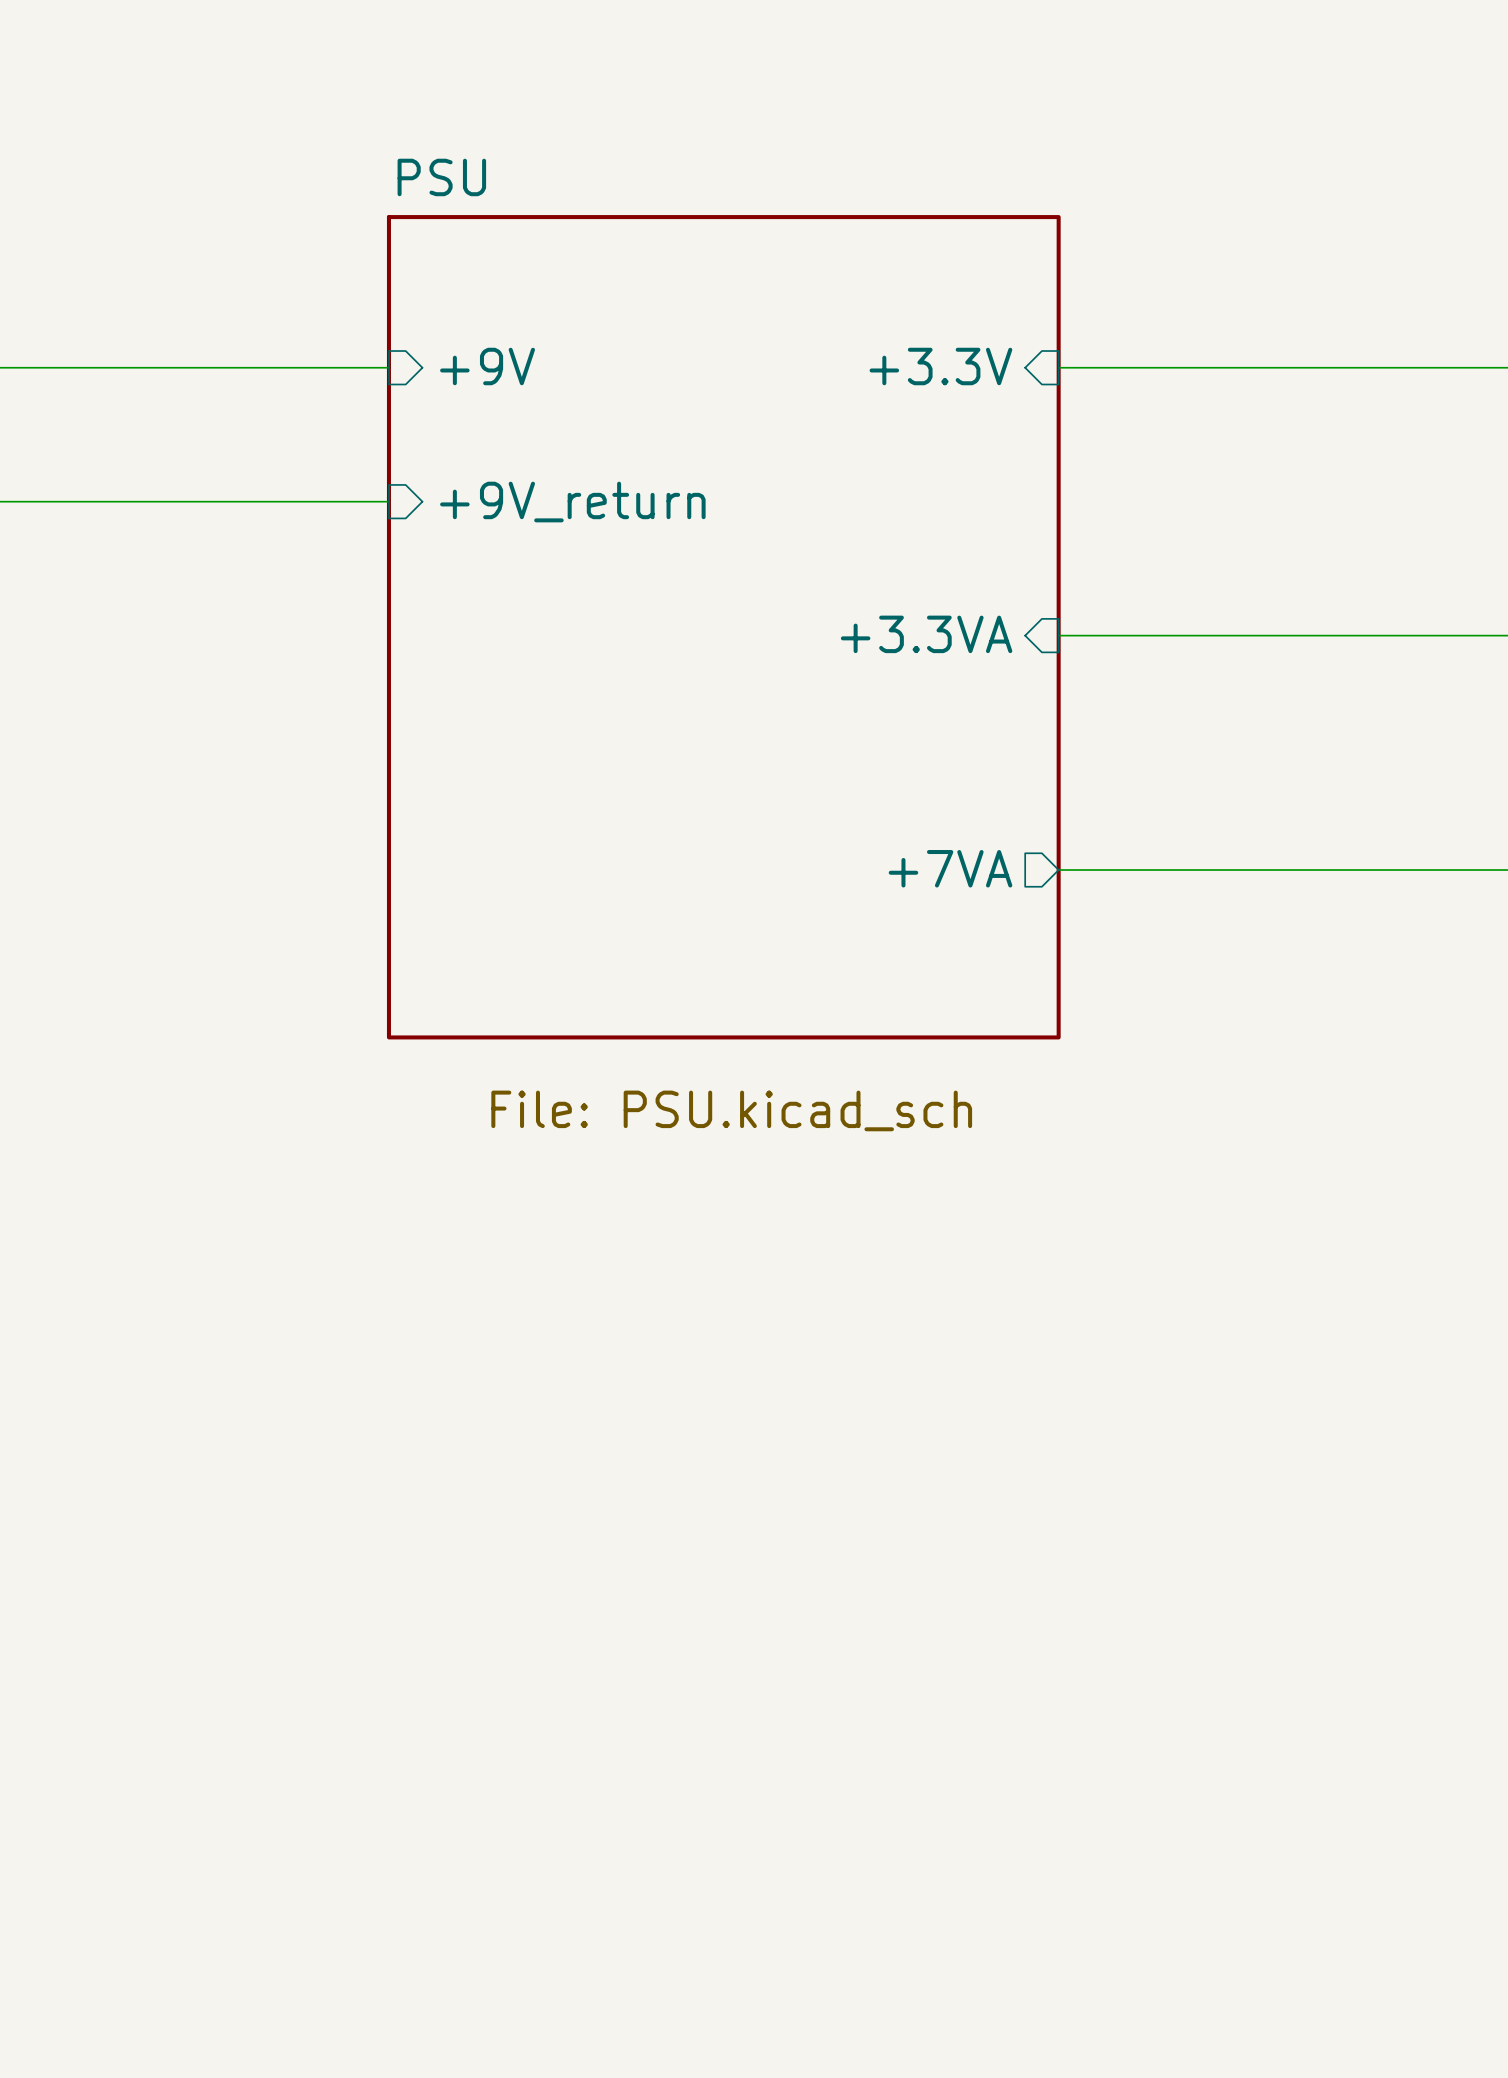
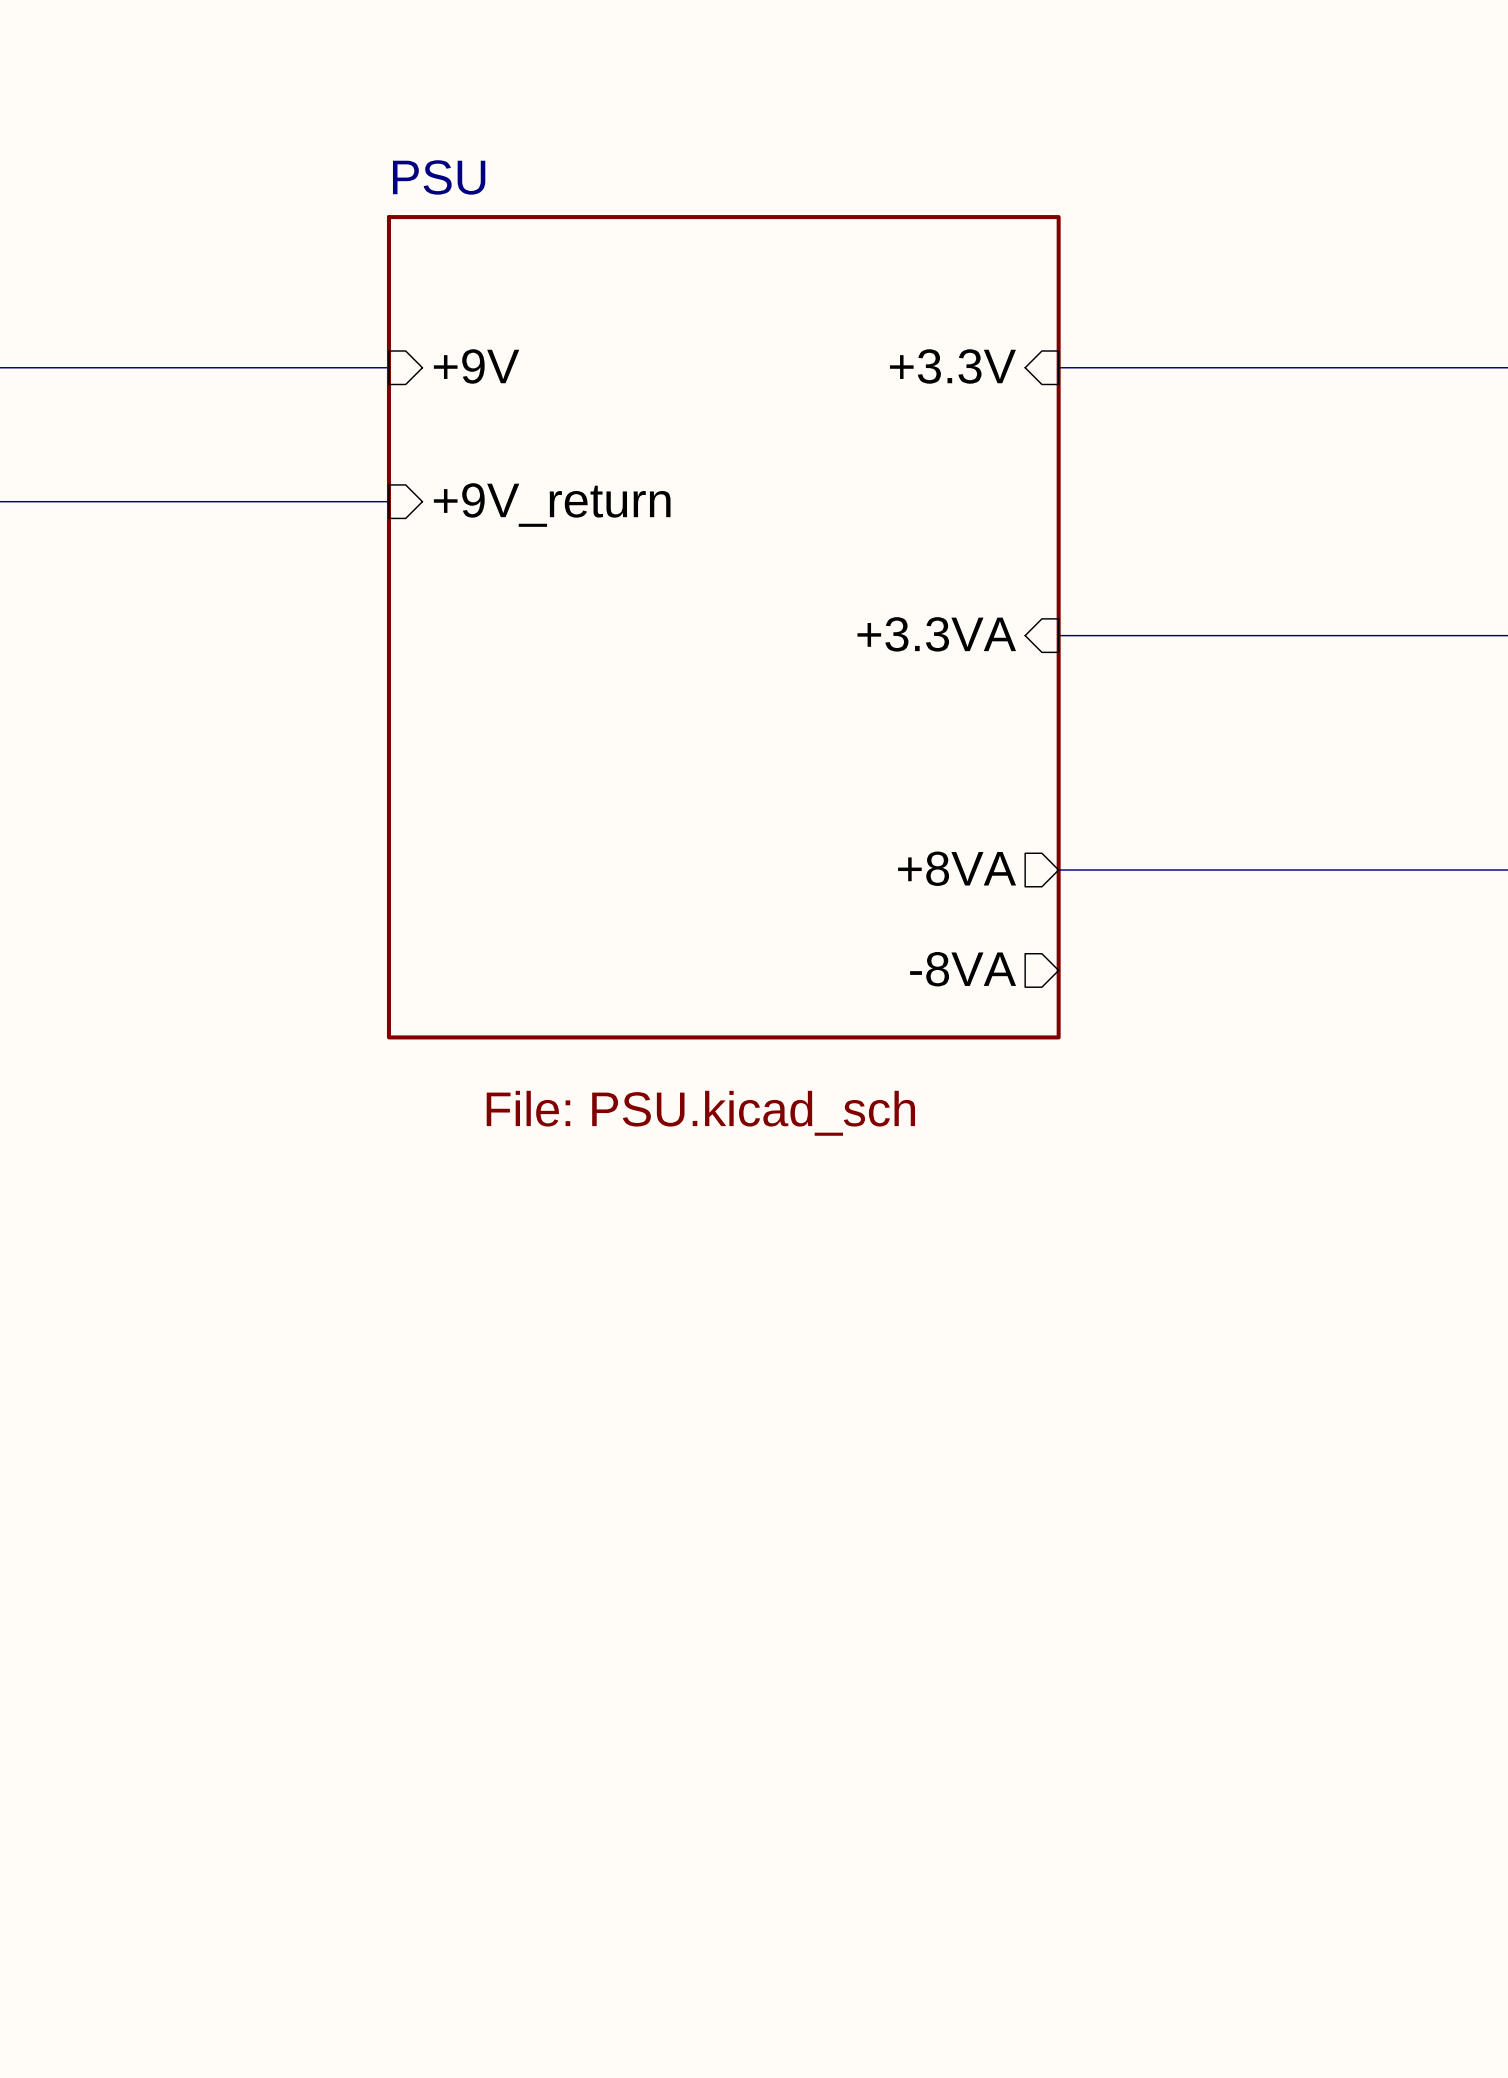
sheet pin: +7VA (950, 868) -> +8VA (957, 868)
sheet pin: none -> -8VA (963, 969)

